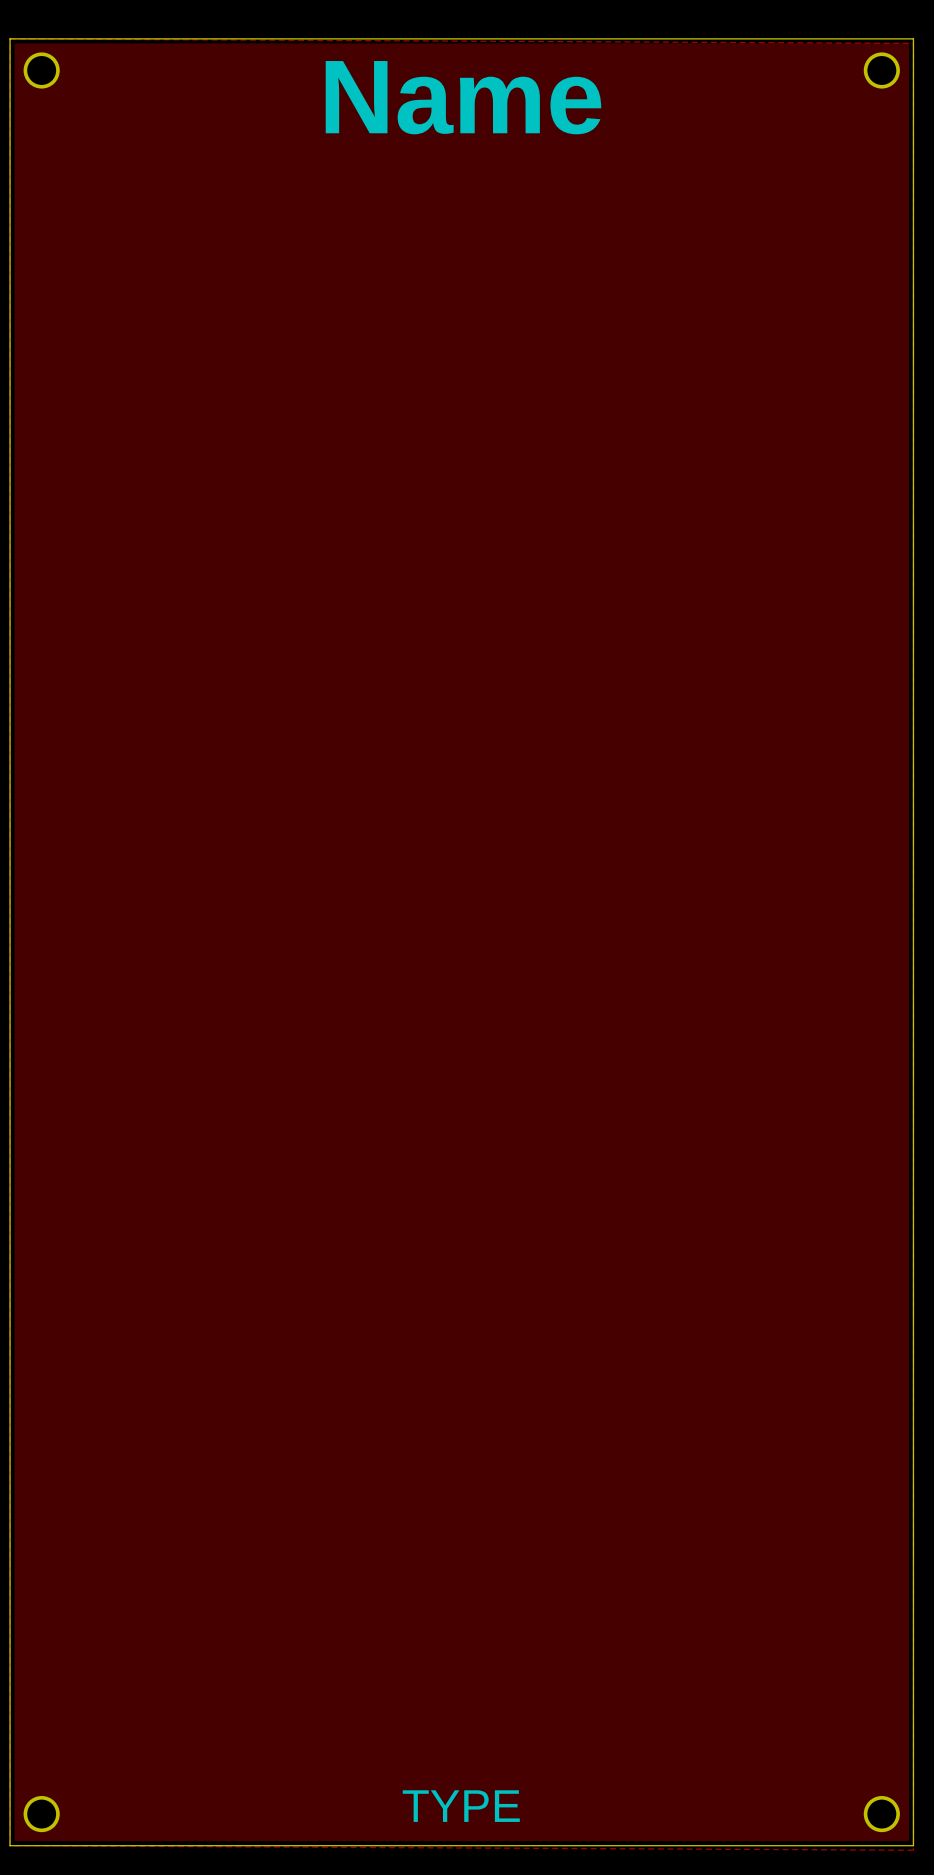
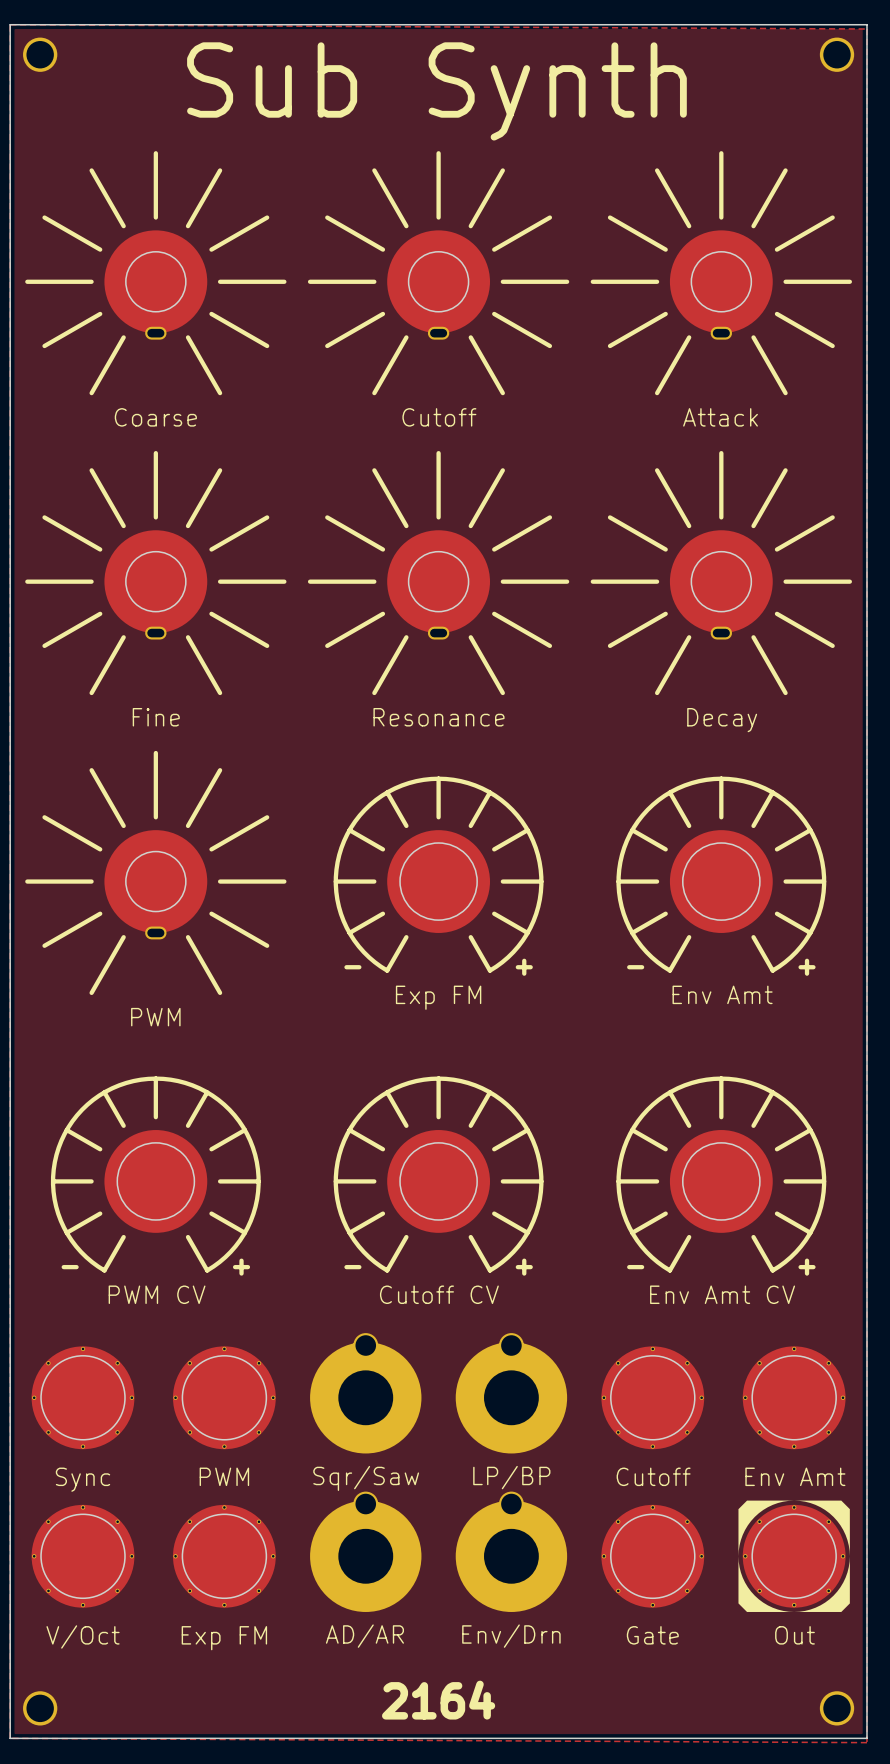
text: Name (463, 97) -> Sub Synth (436, 91)
part: none -> Coarse (155, 273)
part: none -> Cutoff (438, 273)
part: none -> Attack (721, 273)
part: none -> Fine (155, 573)
part: none -> Resonance (438, 573)
part: none -> Decay (721, 573)
part: none -> PWM (155, 872)
part: none -> Exp FM (438, 876)
part: none -> Env Amt (721, 876)
part: none -> PWM CV (155, 1176)
part: none -> Cutoff CV (438, 1176)
part: none -> Env Amt CV (721, 1176)
part: none -> Sqr/Saw (365, 1393)
part: none -> LP/BP (511, 1393)
part: none -> Sync (83, 1397)
part: none -> PWM (224, 1397)
part: none -> Cutoff (652, 1397)
part: none -> Env Amt (794, 1397)
part: none -> AD/AR (365, 1551)
part: none -> Env/Drn (511, 1551)
part: none -> V/Oct (83, 1556)
part: none -> Exp FM (224, 1556)
part: none -> Gate (652, 1556)
part: none -> Out (794, 1556)
text: TYPE (461, 1806) -> 2164 (438, 1700)

